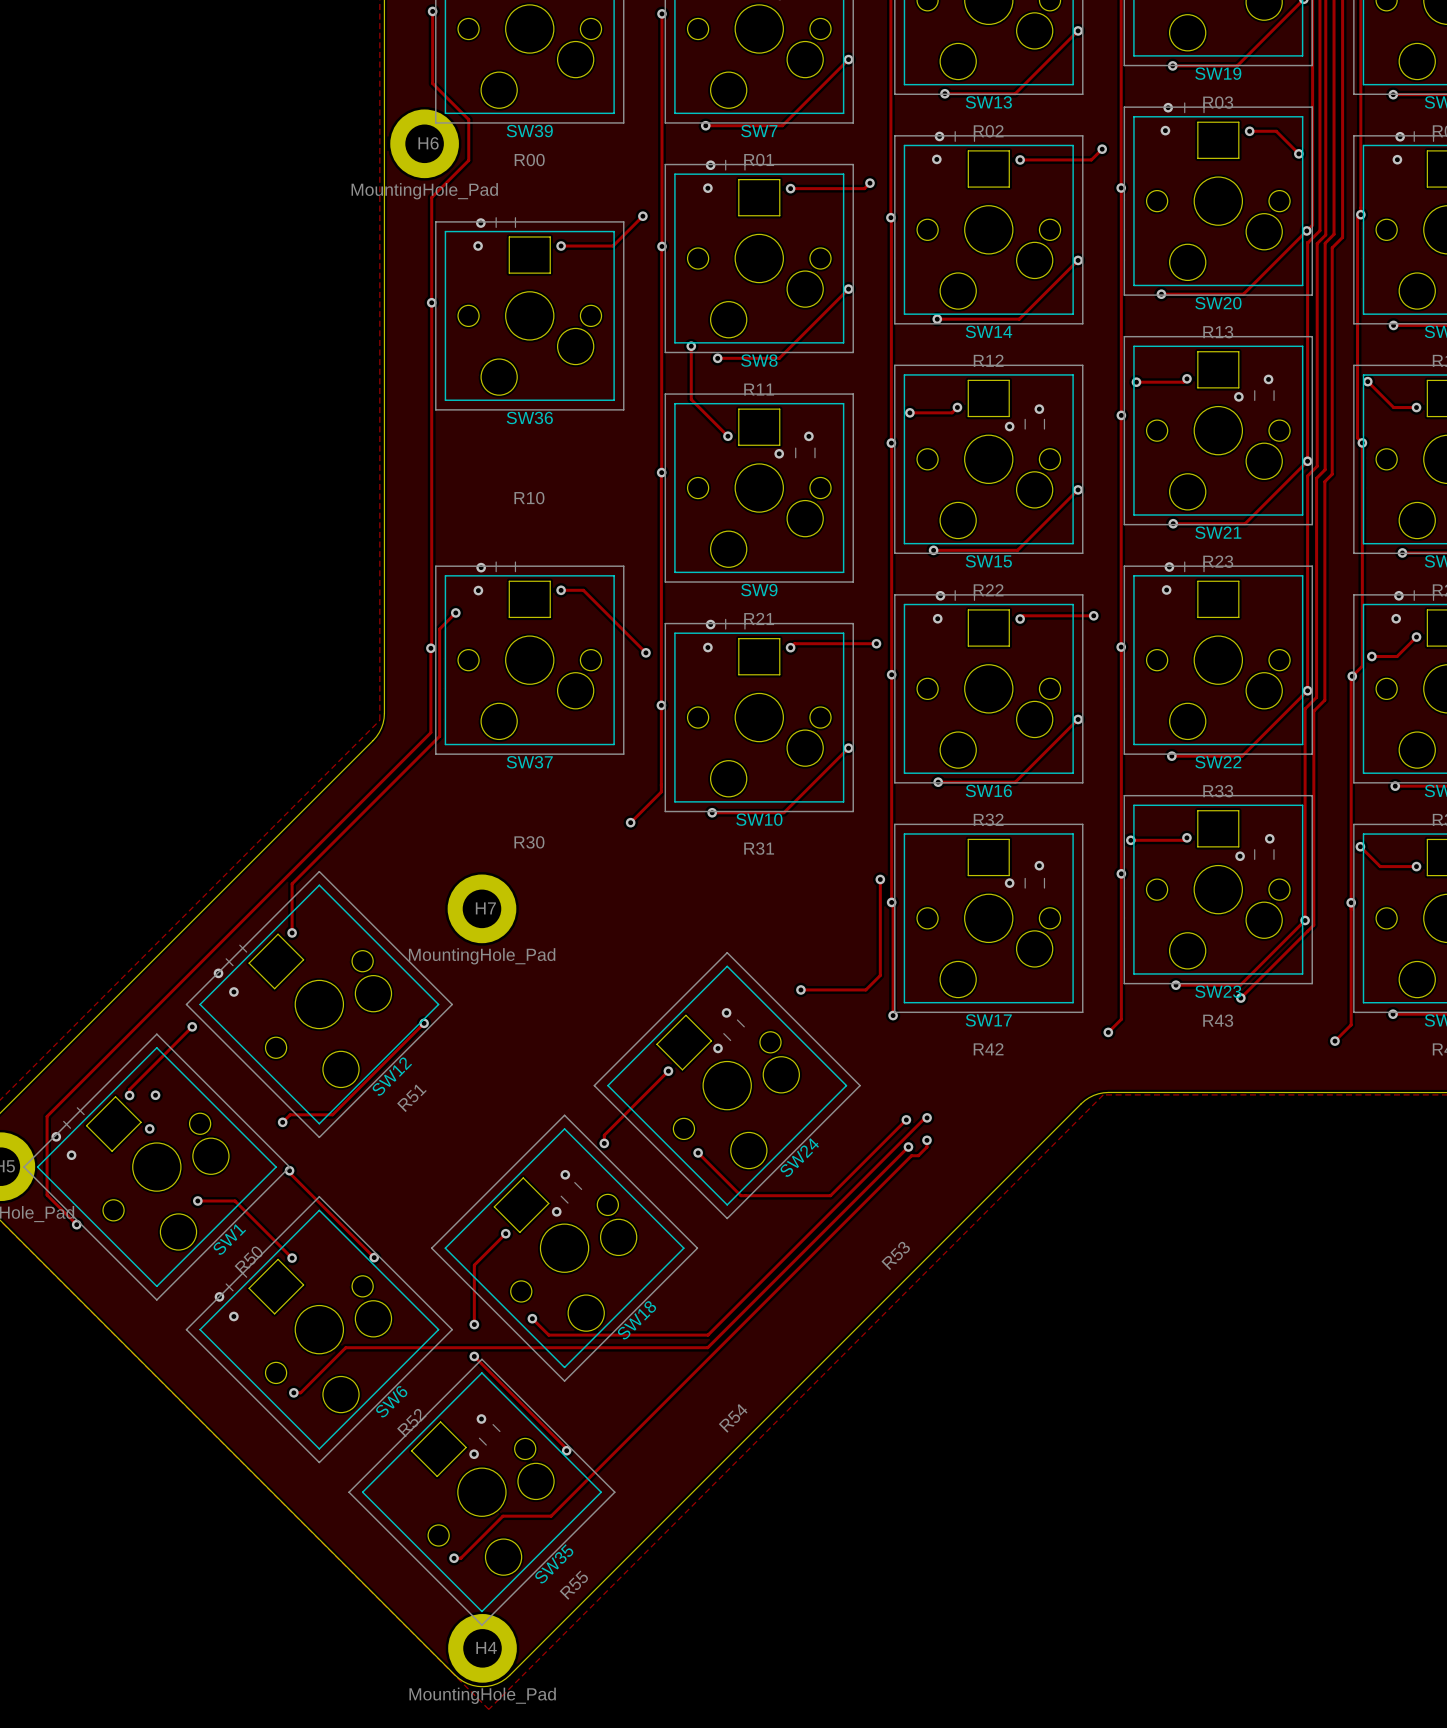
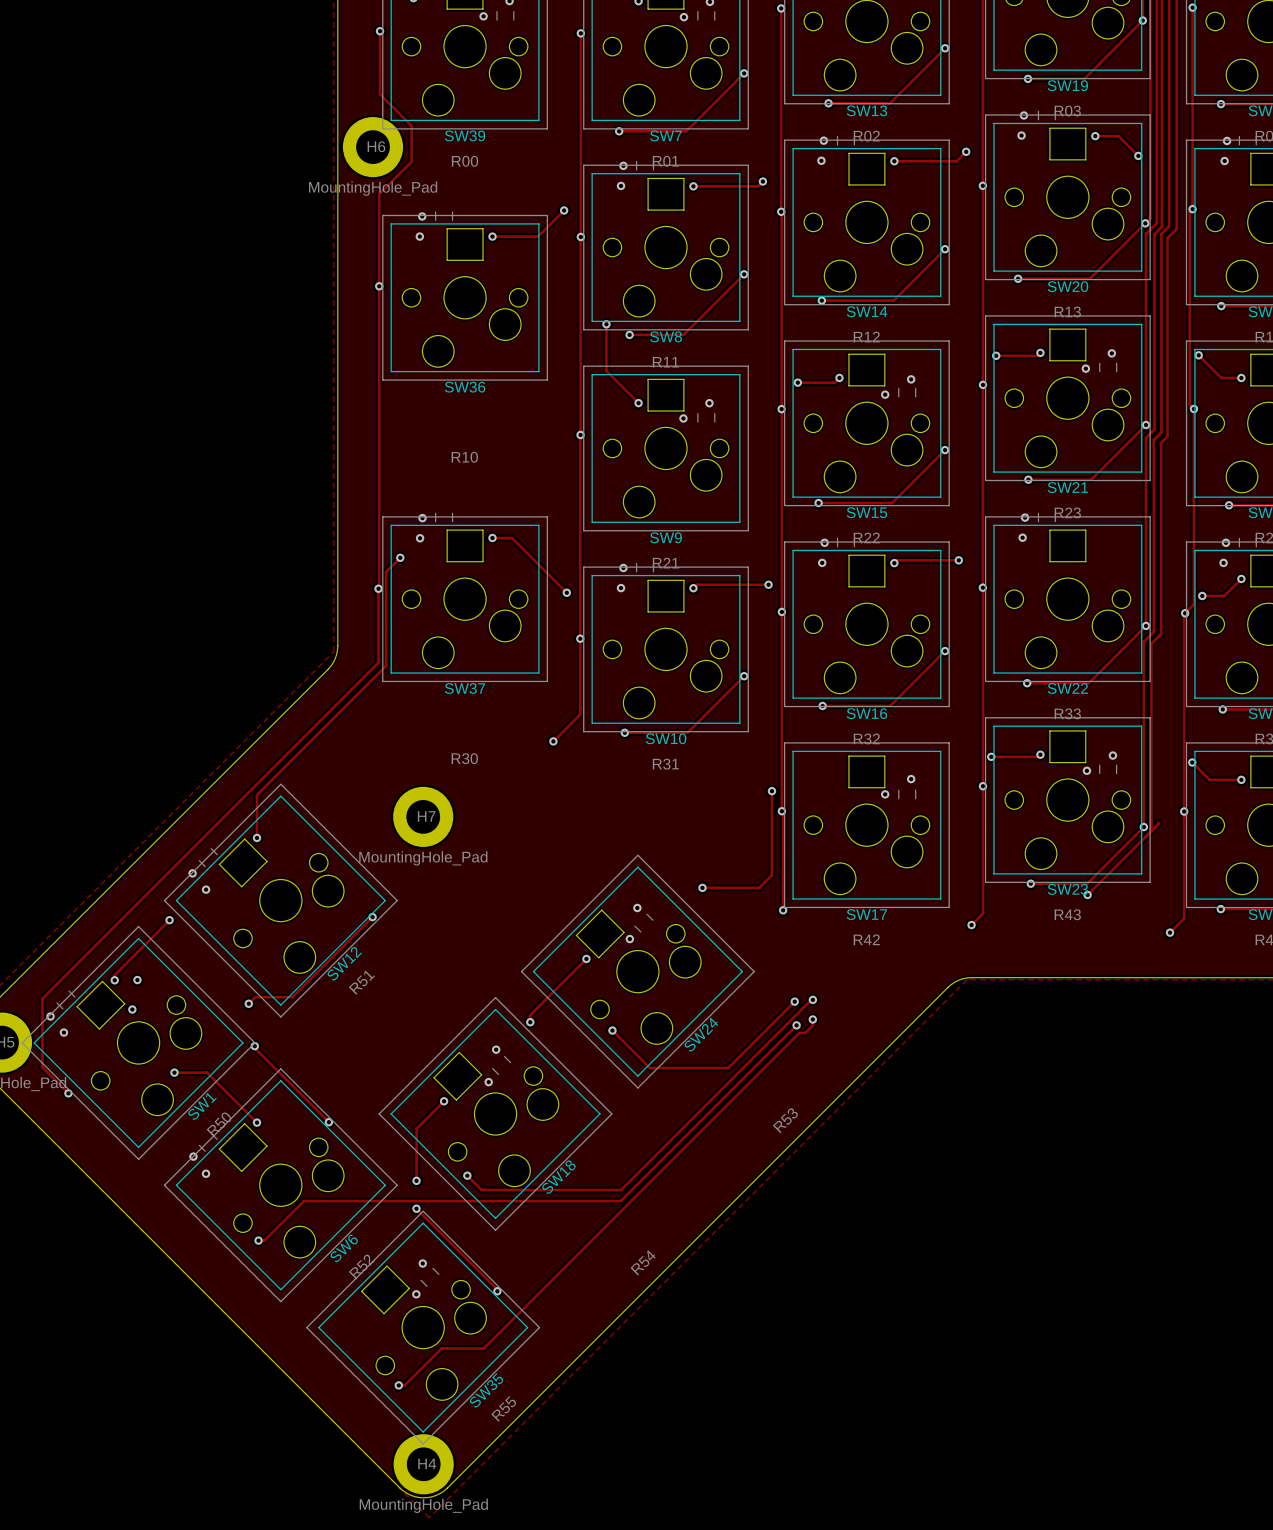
track: none -> (1158, 822) (1151, 831)

